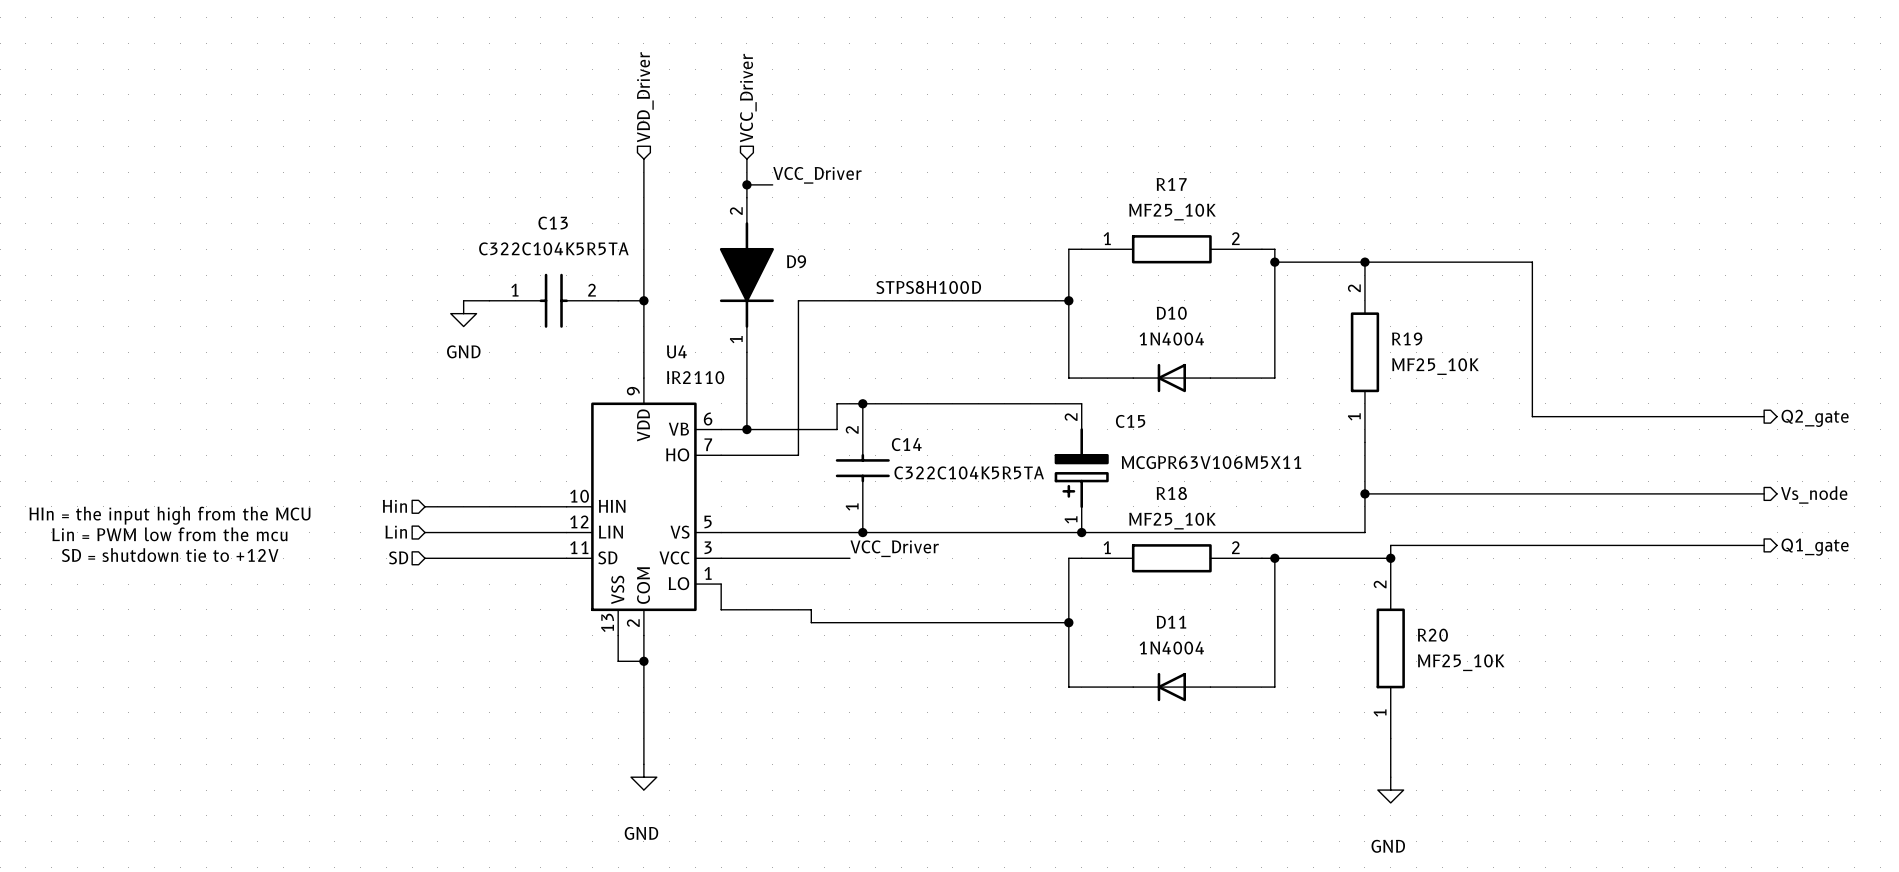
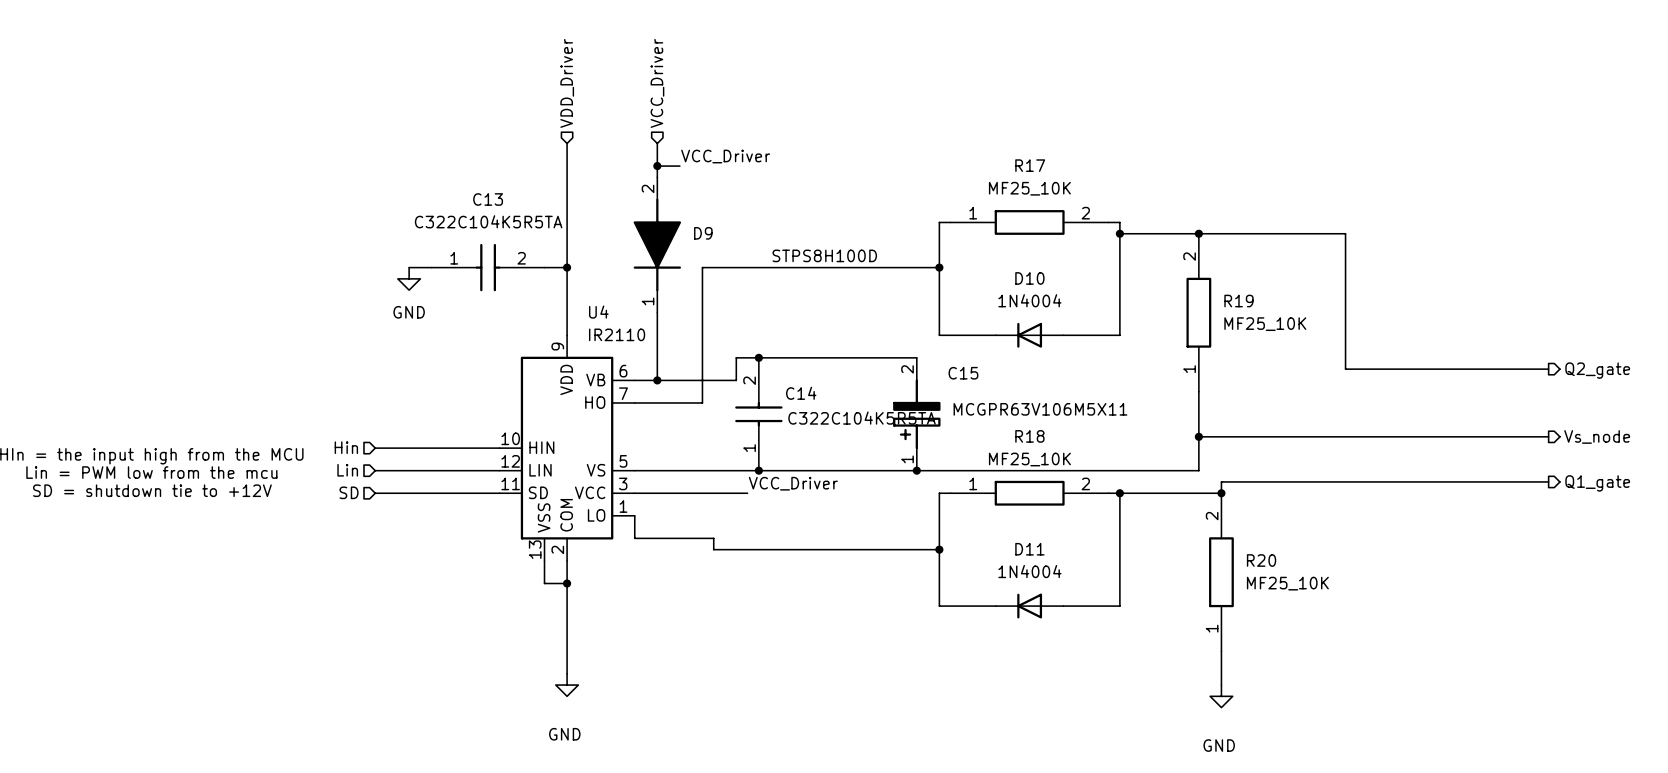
wire: (1043, 403) (1081, 403) -> none
C15 position: (1081, 468) -> (916, 414)
junction position: (1081, 532) -> (916, 470)

